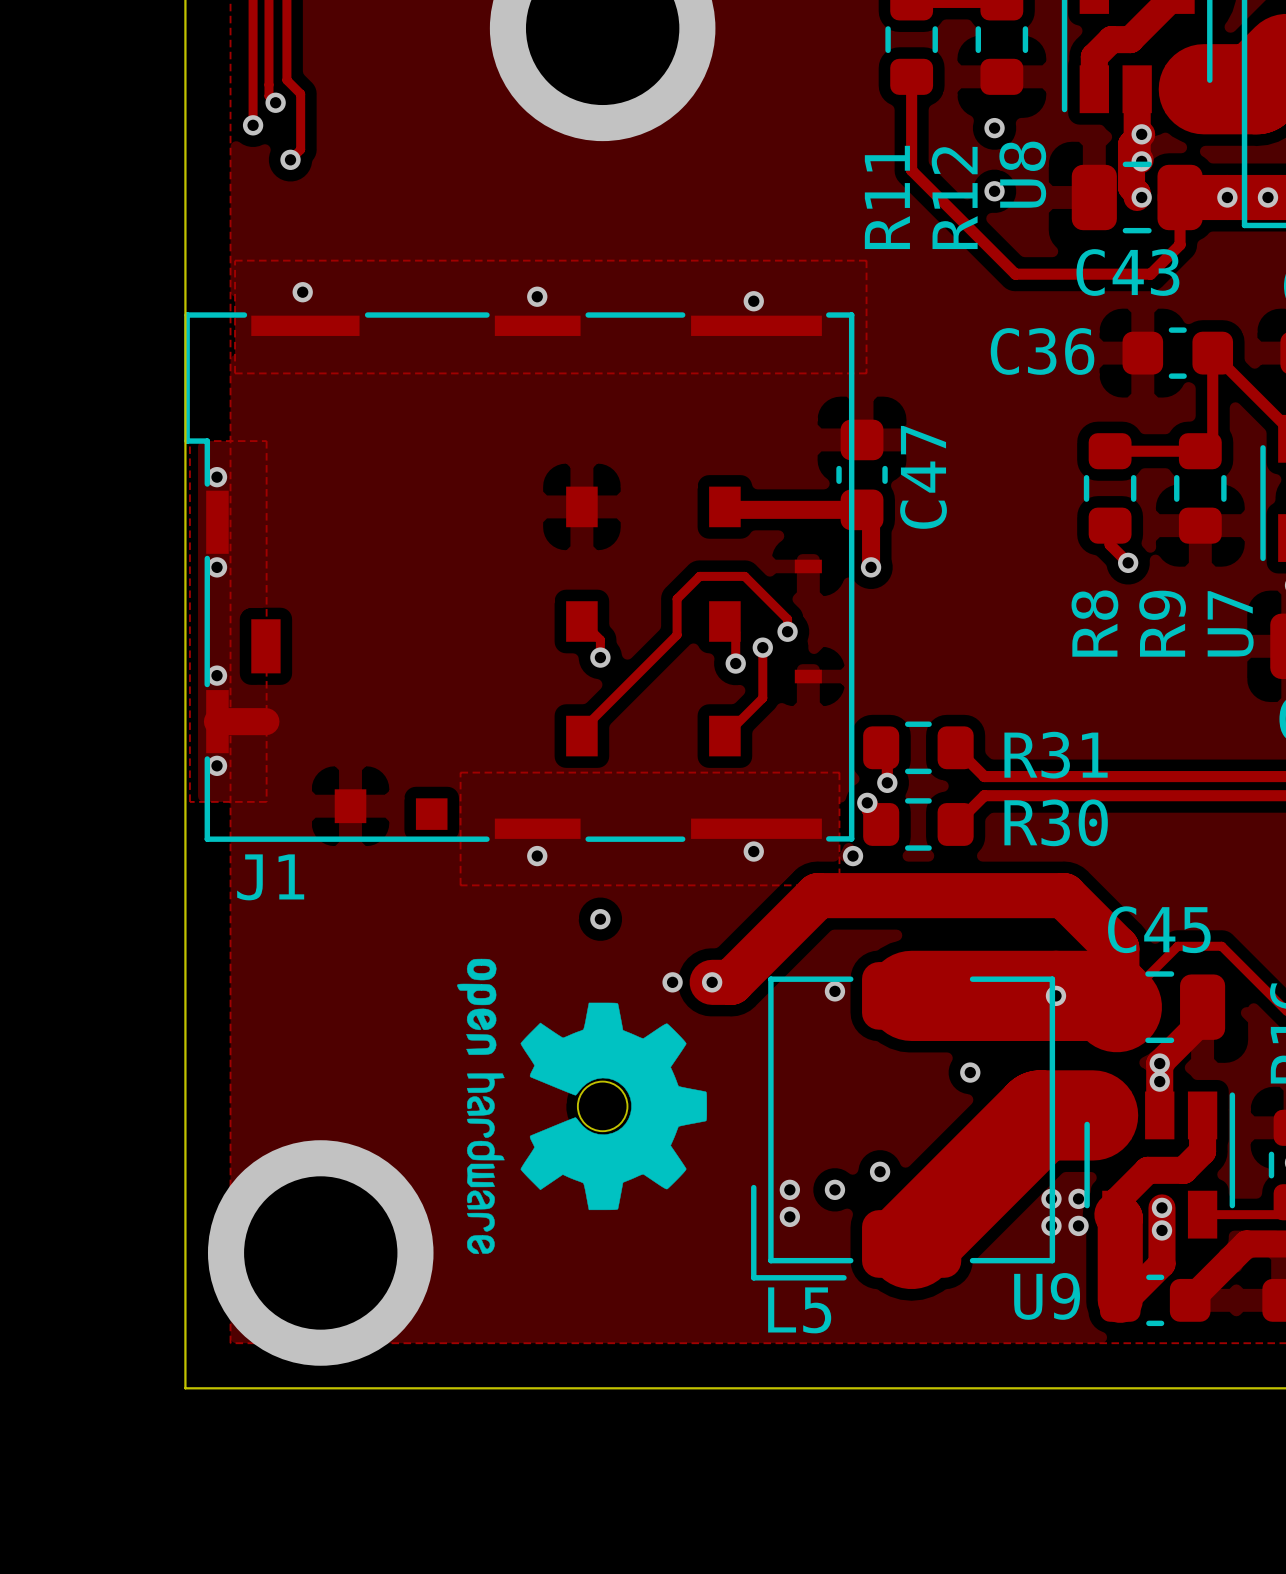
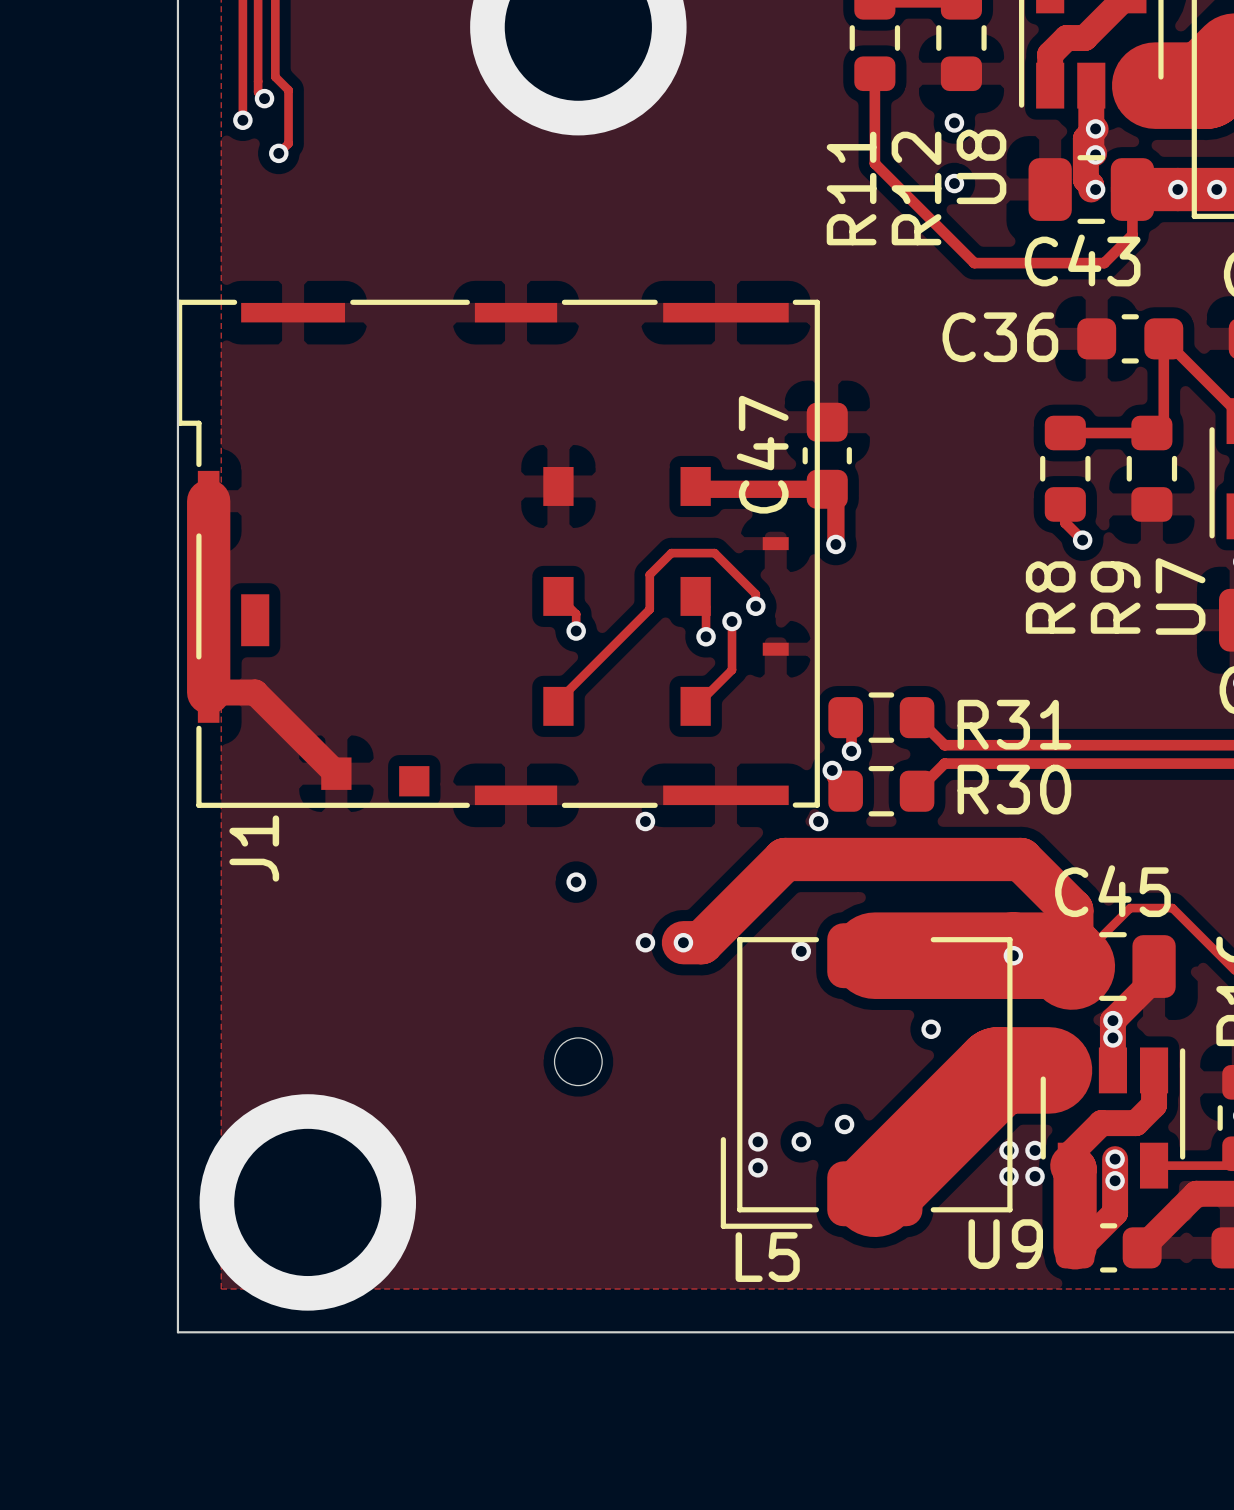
zone outline: (235, 260) (235, 373) (866, 373) (866, 260) (235, 260) -> none
via: (302, 292) -> none
via: (537, 296) -> none
via: (753, 301) -> none
zone outline: (189, 441) (189, 801) (266, 801) (266, 441) (189, 441) -> none
via: (217, 477) -> none
C47 name position: C47 (923, 477) -> C47 (762, 454)
track: none -> (208, 501) (208, 692)
via: (217, 567) -> none
via: (217, 675) -> none
track: none -> (255, 692) (336, 773)
via: (217, 765) -> none
zone outline: (460, 772) (460, 885) (839, 885) (839, 772) (460, 772) -> none
via: (753, 851) -> none
via: (537, 856) -> none
via: none -> (645, 821)
J1 name rotation: 0° (270, 877) -> 90° counterclockwise (254, 848)
drawing: [457, 958, 707, 1254] -> none

